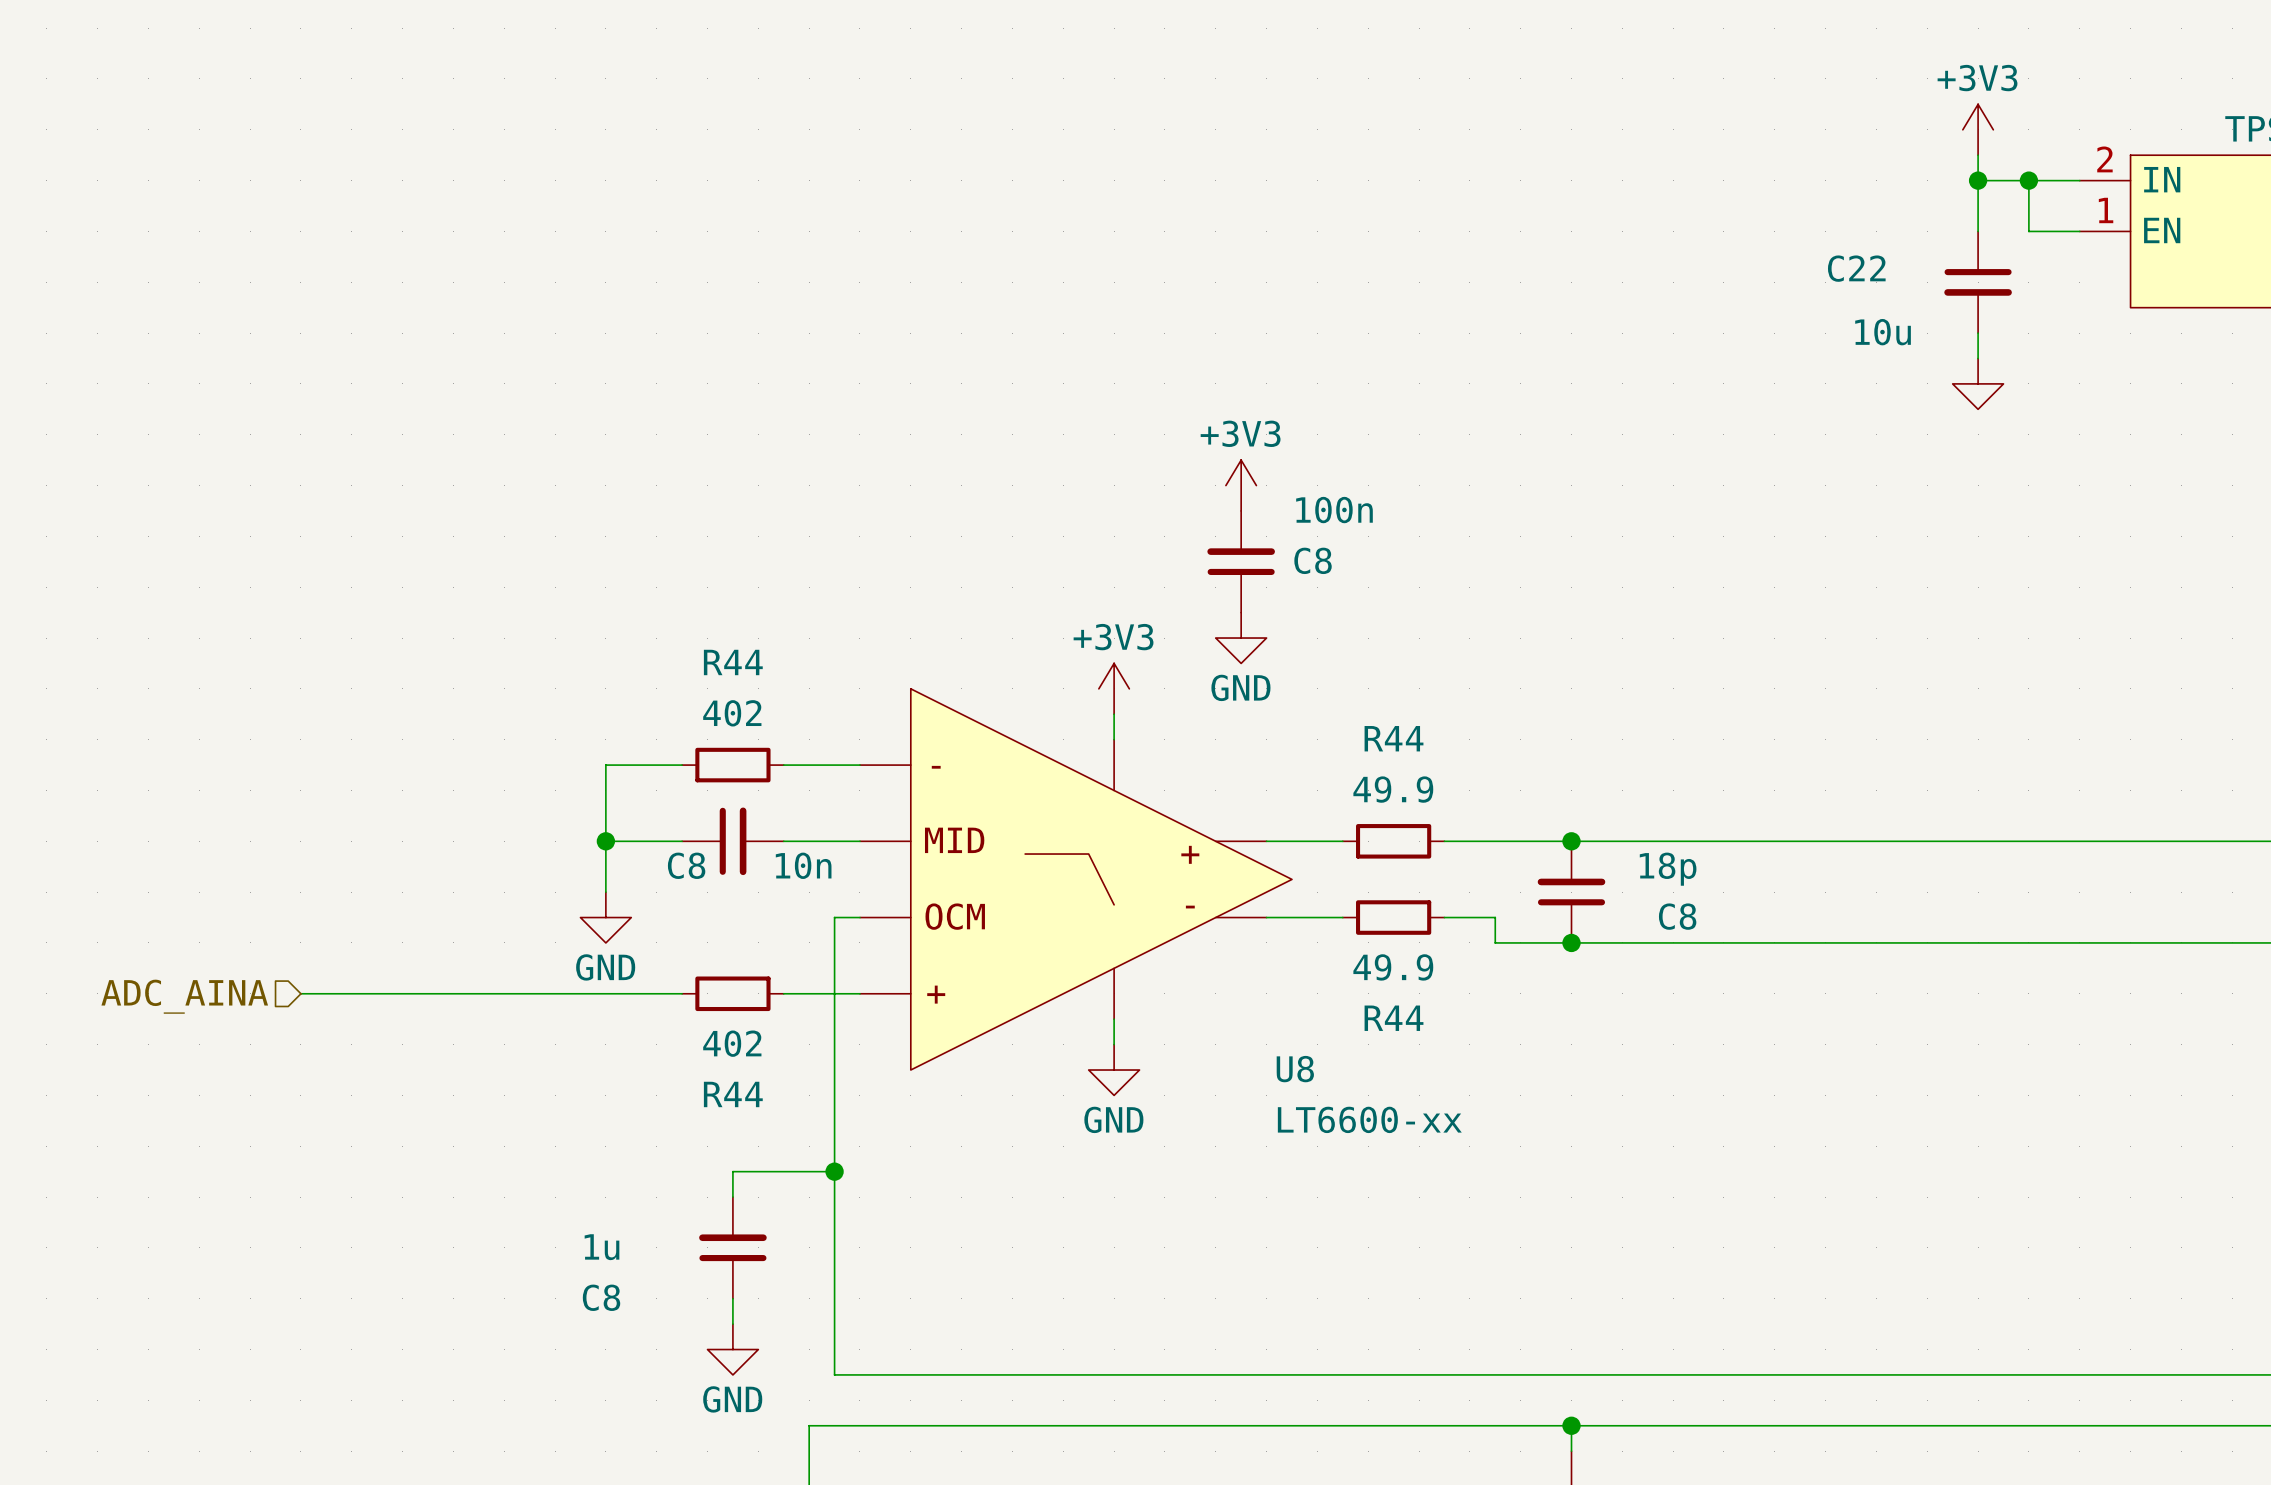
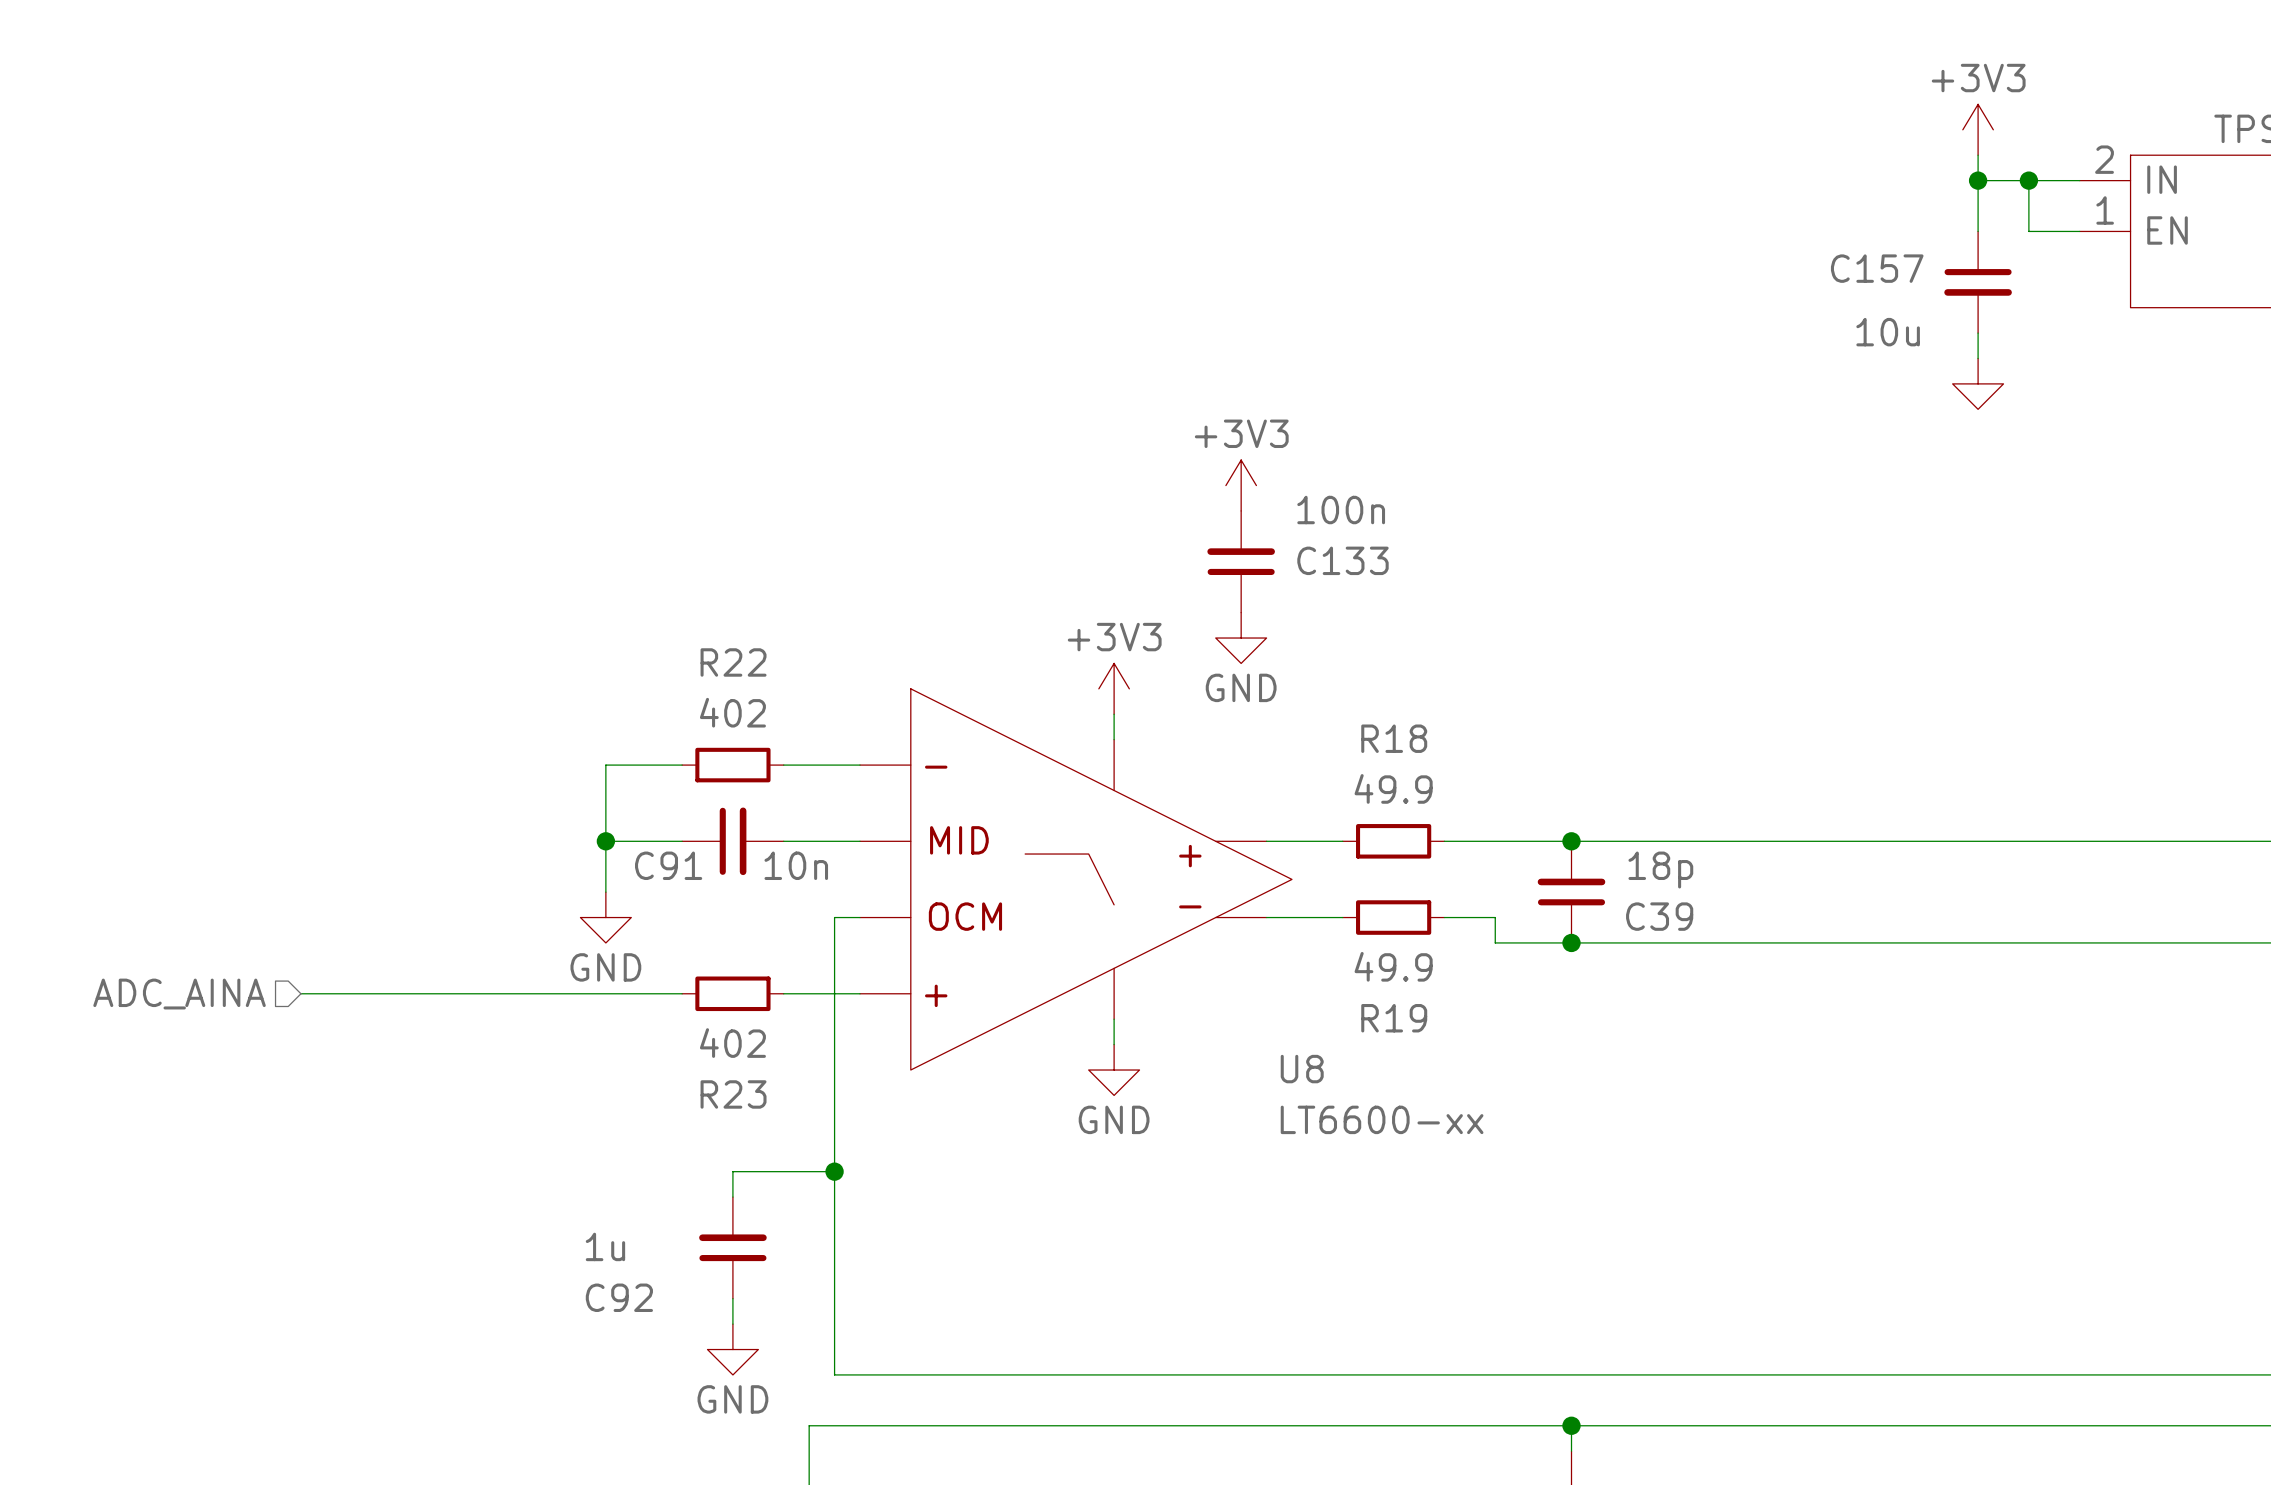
C22 name: C22 (1856, 268) -> C157 (1877, 268)
C8 name: C8 (1313, 560) -> C133 (1342, 560)
R44 name: R44 (733, 662) -> R22 (733, 662)
R44 name: R44 (1394, 738) -> R18 (1394, 738)
C8 name: C8 (686, 865) -> C91 (668, 865)
C8 name: C8 (1677, 916) -> C39 (1659, 916)
R44 name: R44 (1394, 1018) -> R19 (1394, 1018)
R44 name: R44 (733, 1094) -> R23 (733, 1094)
C8 name: C8 (601, 1297) -> C92 (619, 1297)

